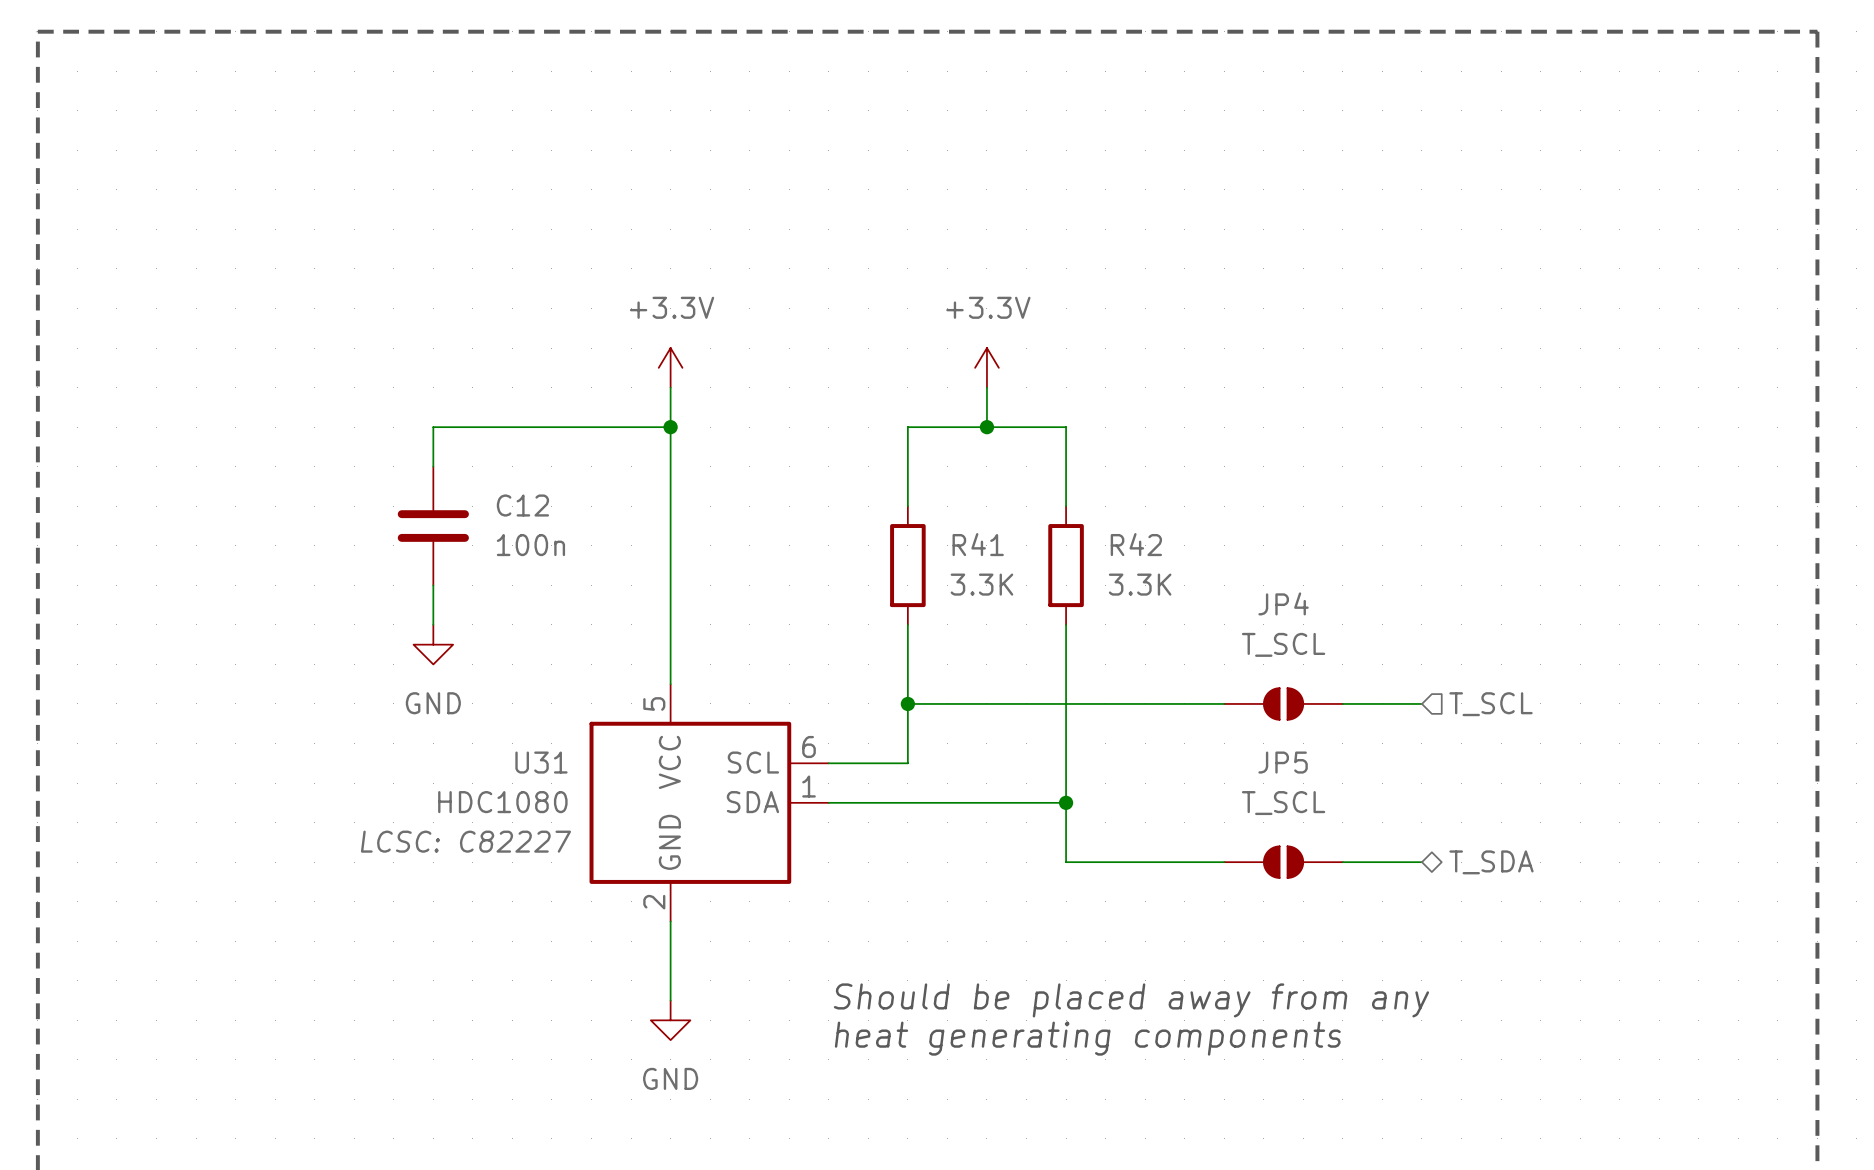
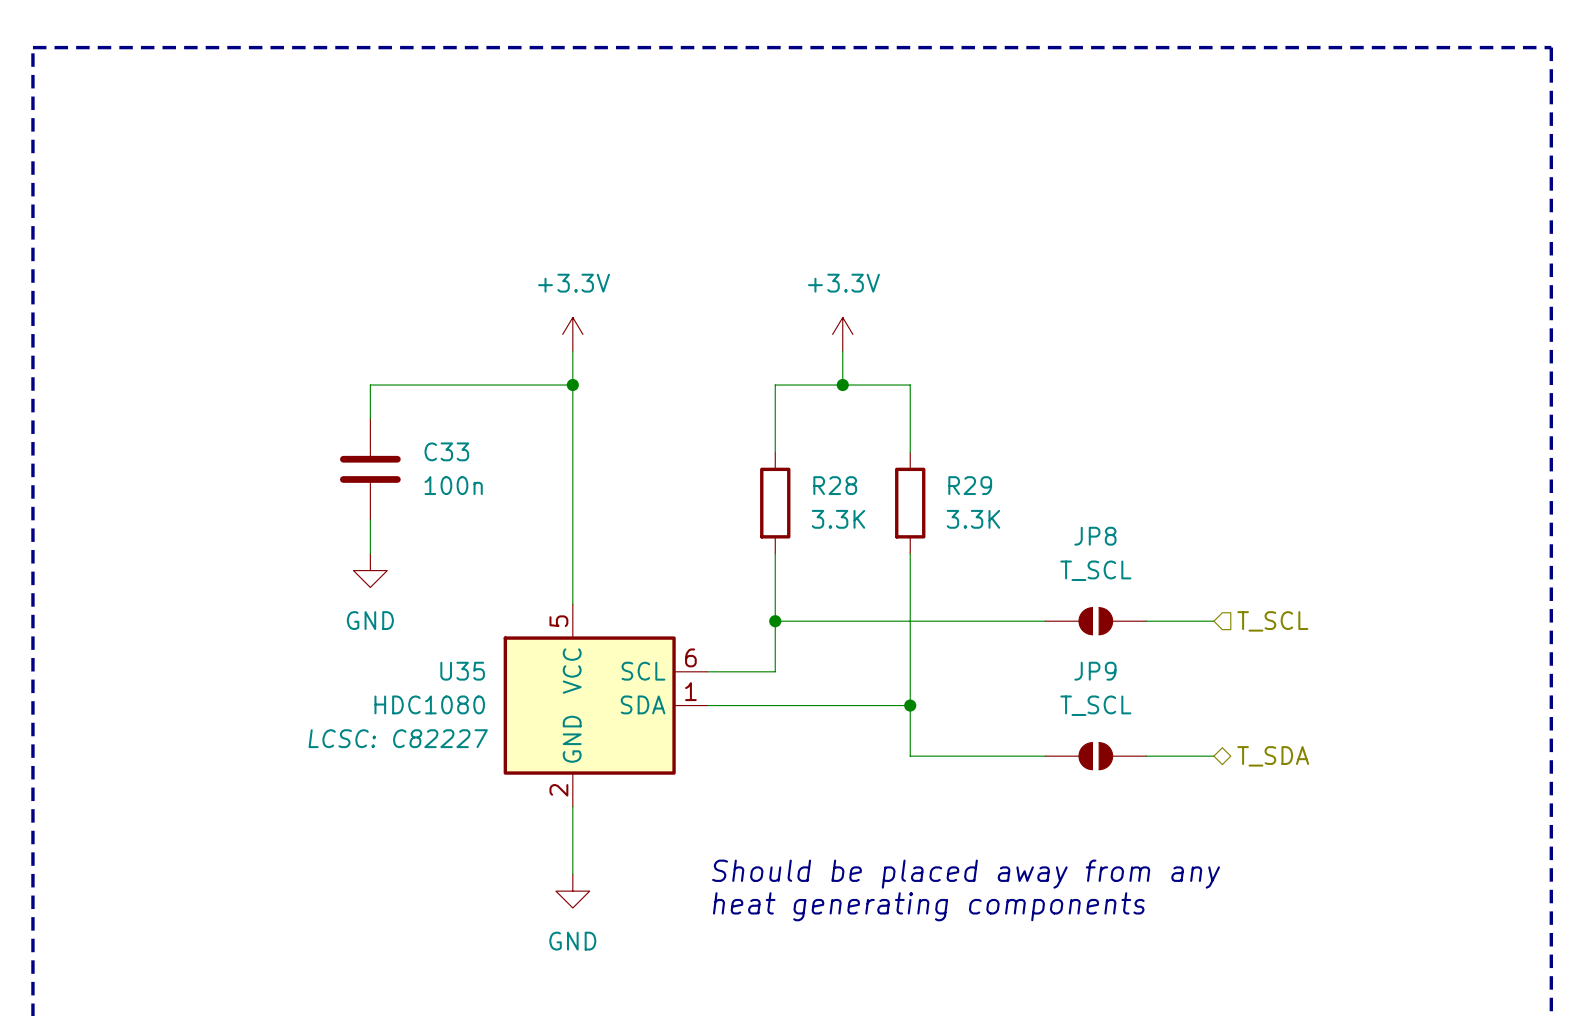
C12 name: C12 (522, 505) -> C33 (446, 451)
R41 name: R41 (978, 544) -> R28 (835, 485)
R42 name: R42 (1136, 544) -> R29 (970, 485)
JP4 name: JP4 (1283, 603) -> JP8 (1095, 536)
U31 name: U31 (541, 762) -> U35 (462, 671)
JP5 name: JP5 (1283, 762) -> JP9 (1095, 671)

